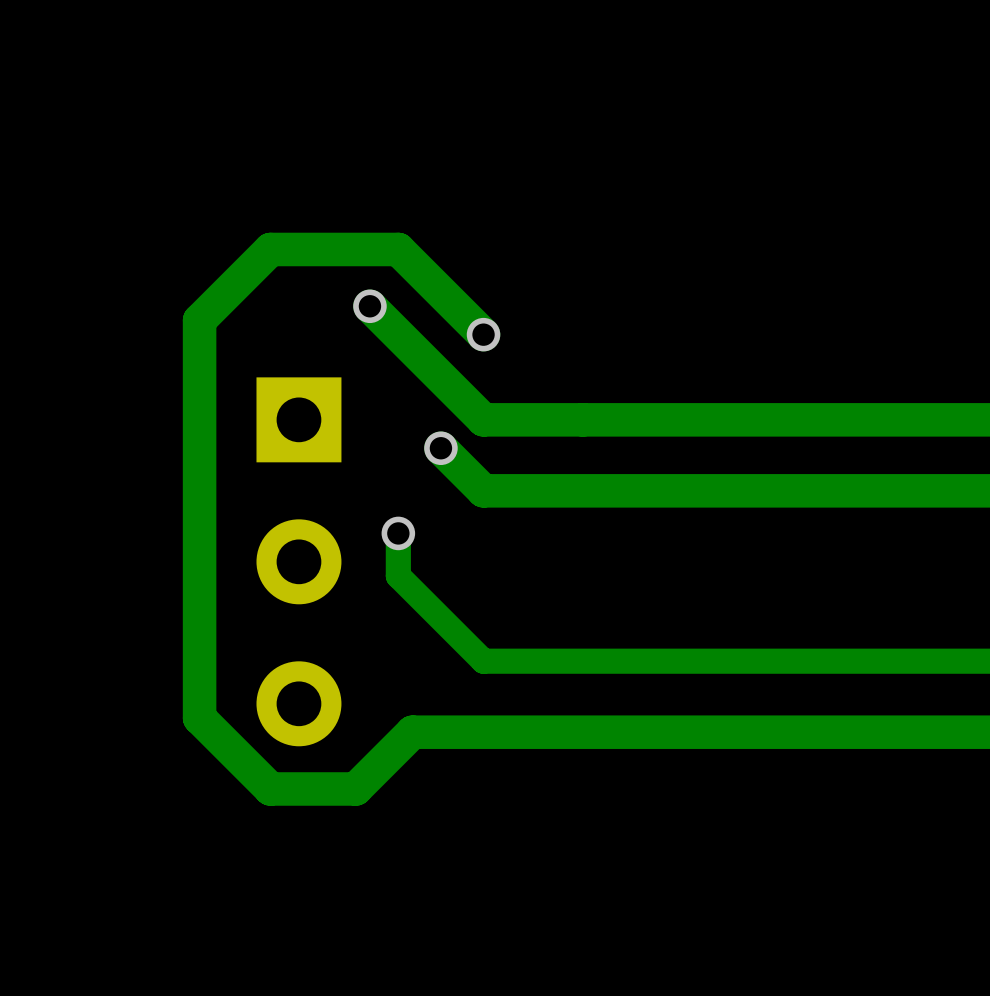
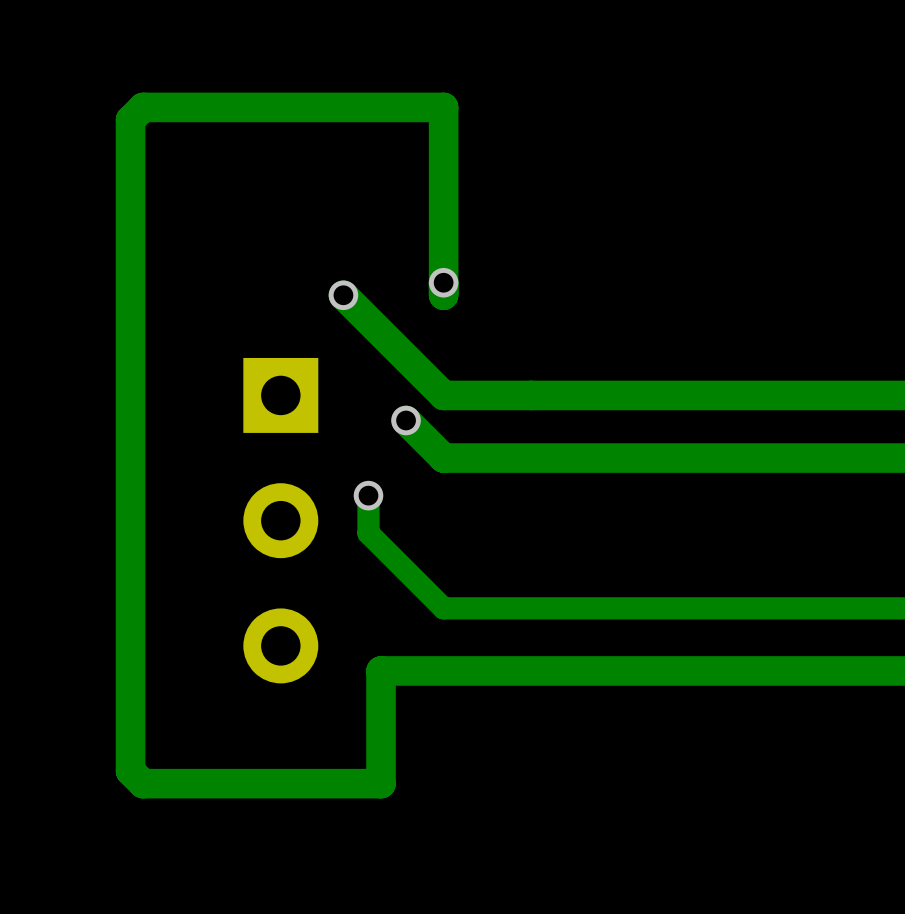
track: (483, 334) (398, 249) (270, 249) (199, 320) (199, 717) (270, 788) (355, 788) (412, 732) -> (443, 295) (443, 107) (143, 107) (130, 119) (130, 771) (143, 783) (381, 783) (381, 670)
via position: (483, 334) -> (443, 282)

